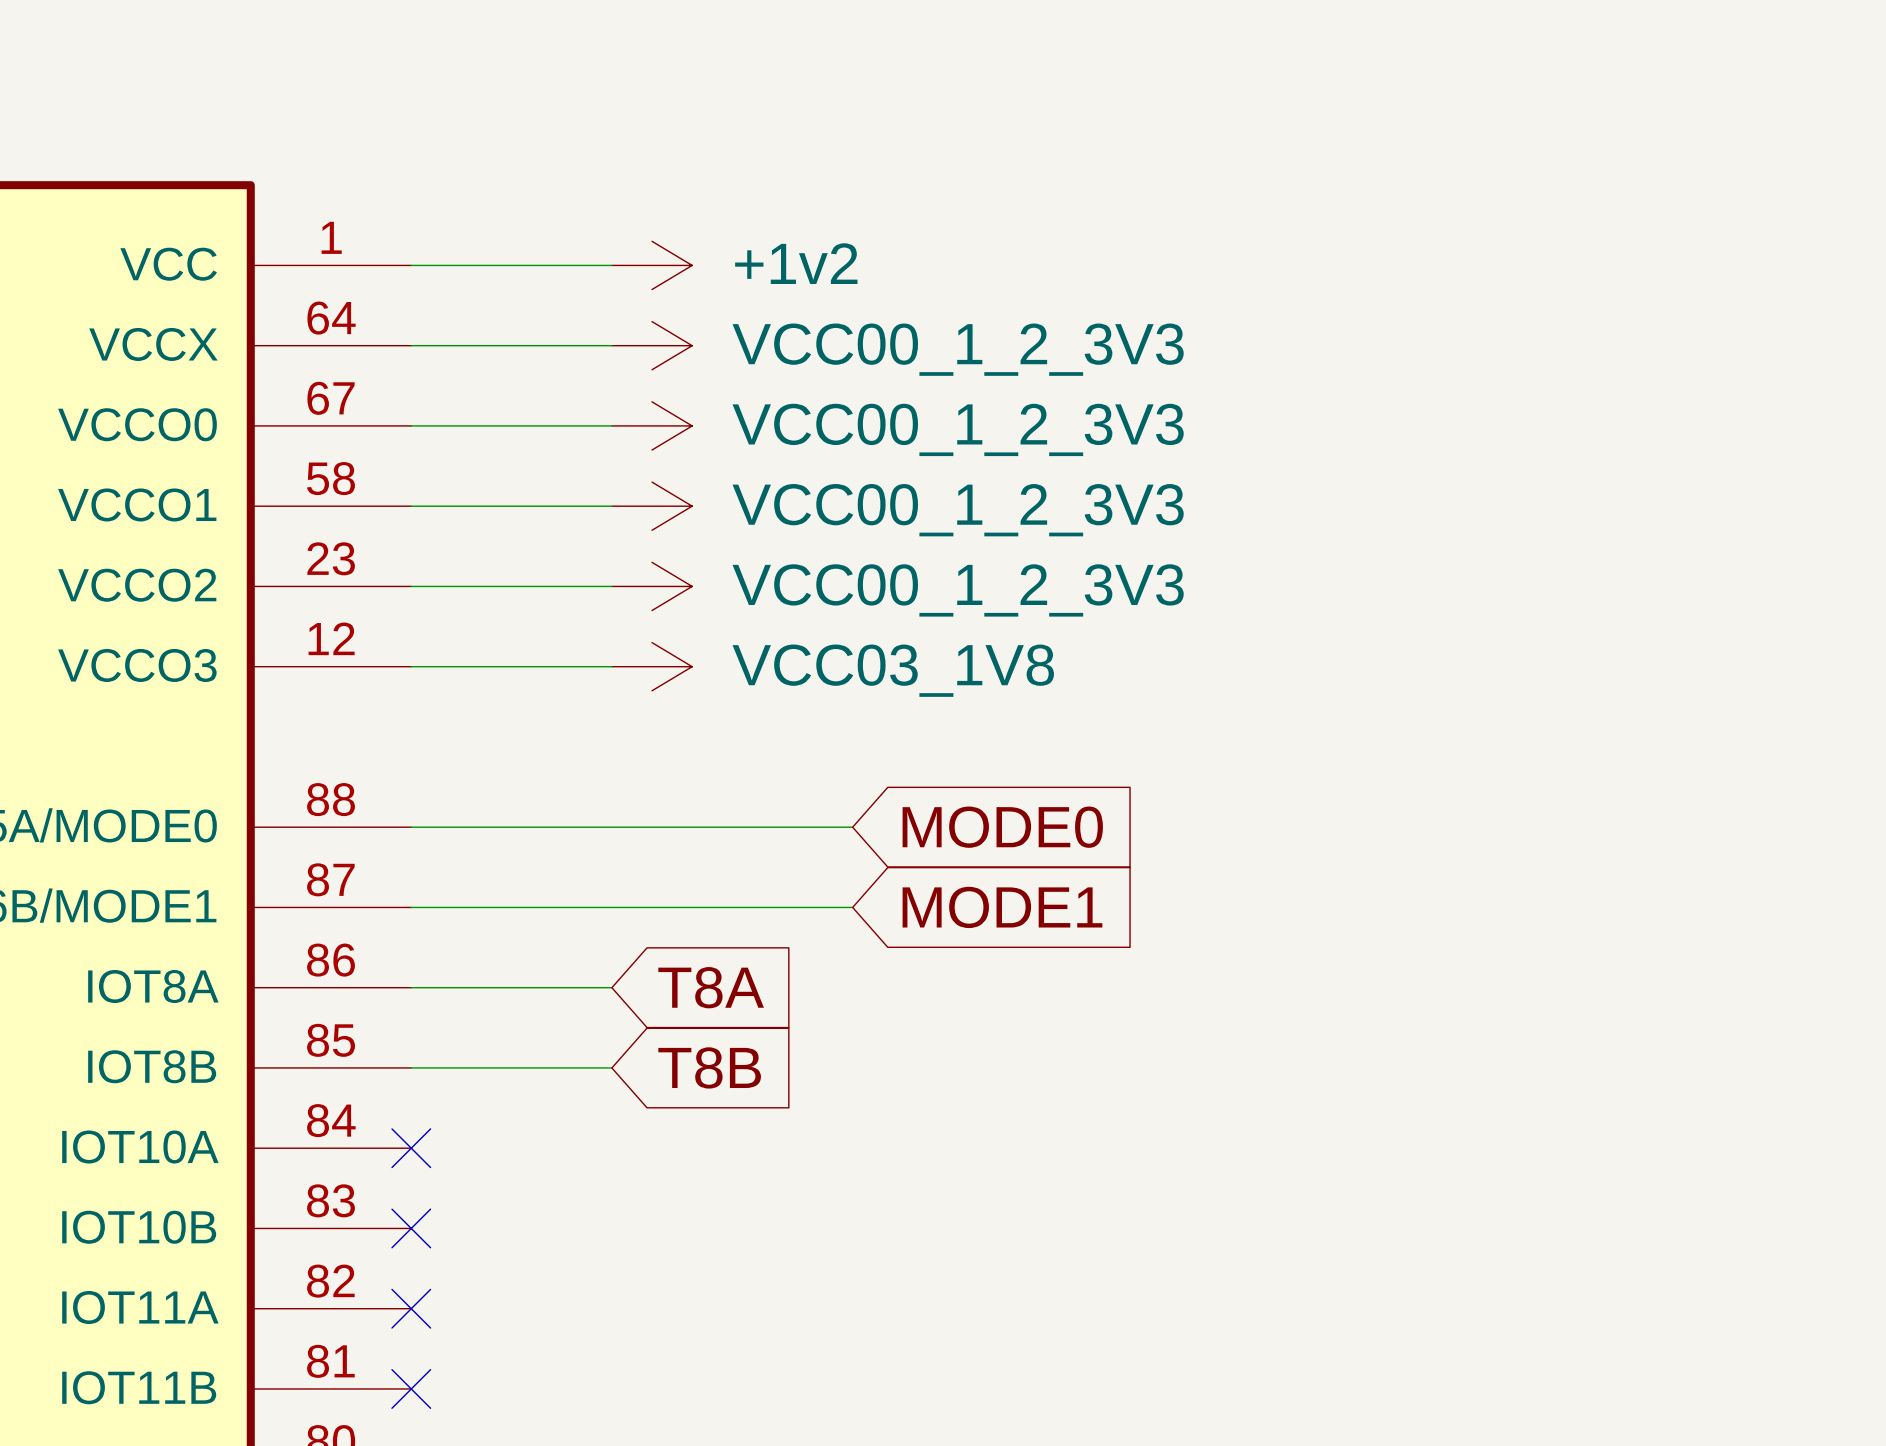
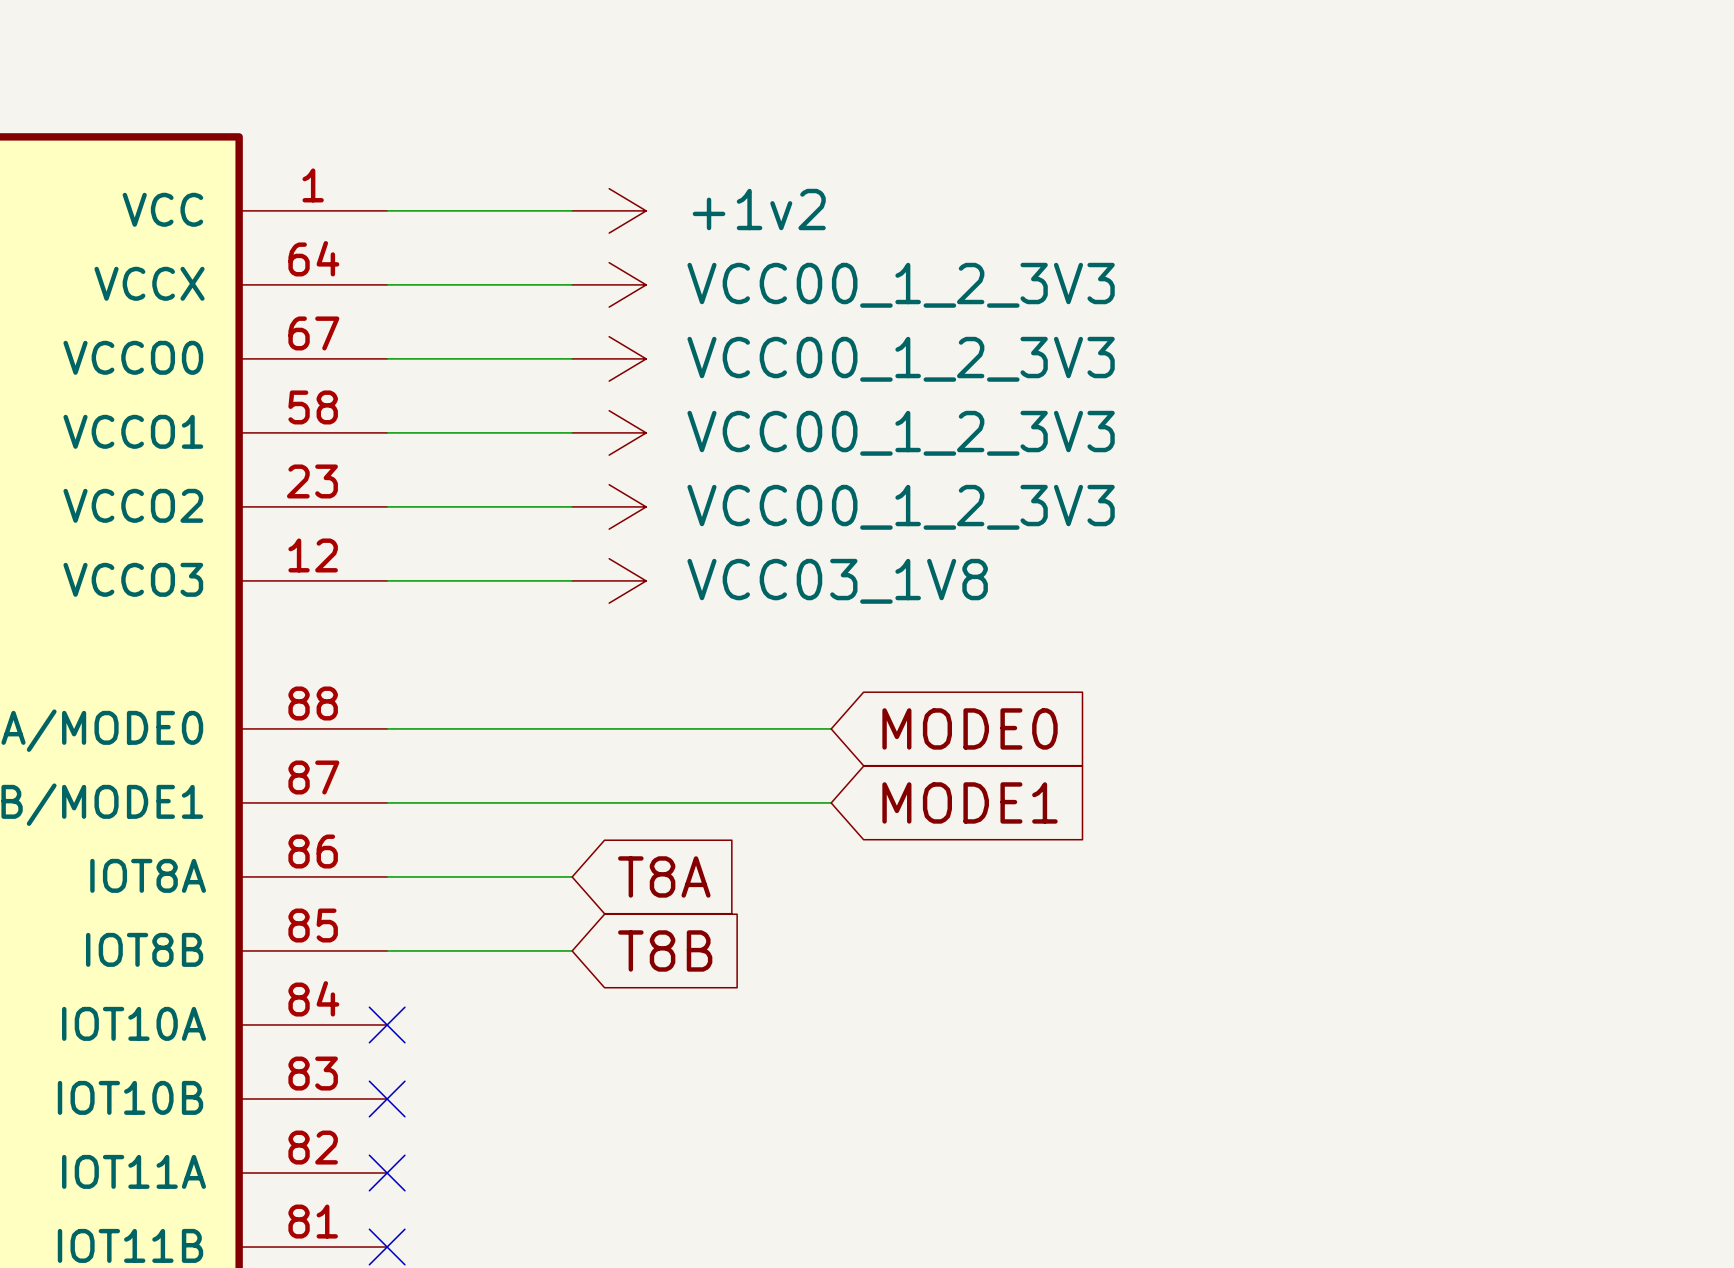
wire: none -> (794, 728) (831, 728)
global label position: MODE0 (1002, 827) -> MODE0 (970, 728)
wire: none -> (794, 802) (831, 802)
global label position: MODE1 (1002, 907) -> MODE1 (970, 802)

